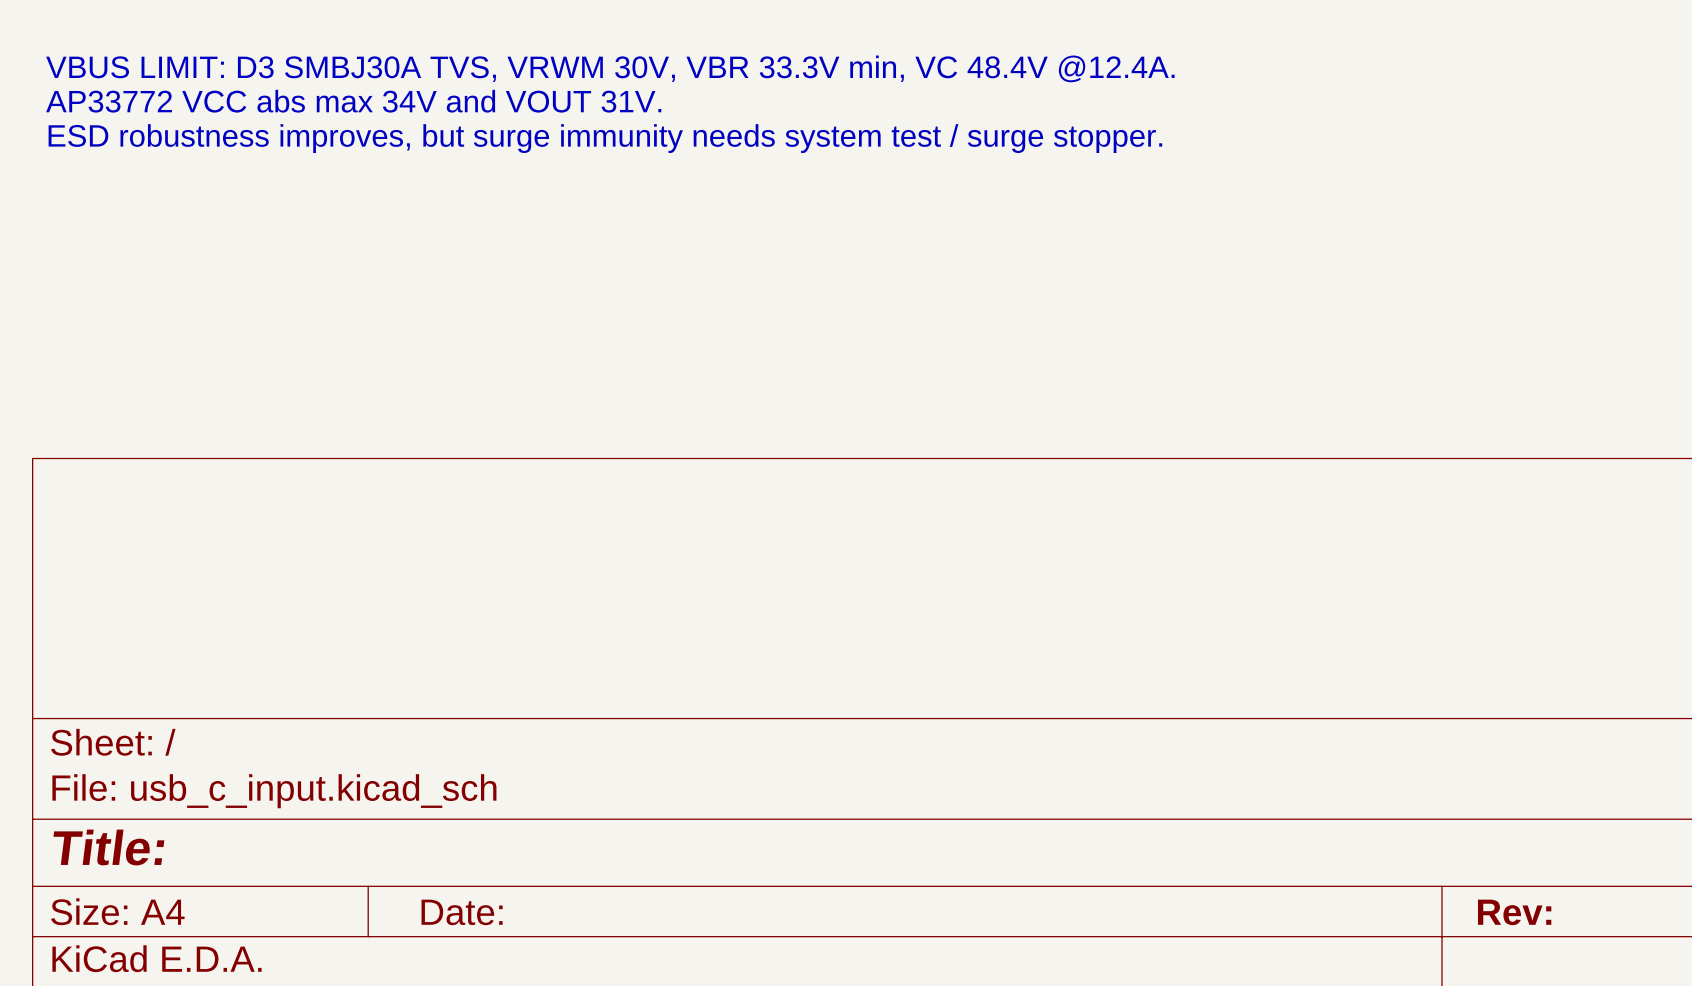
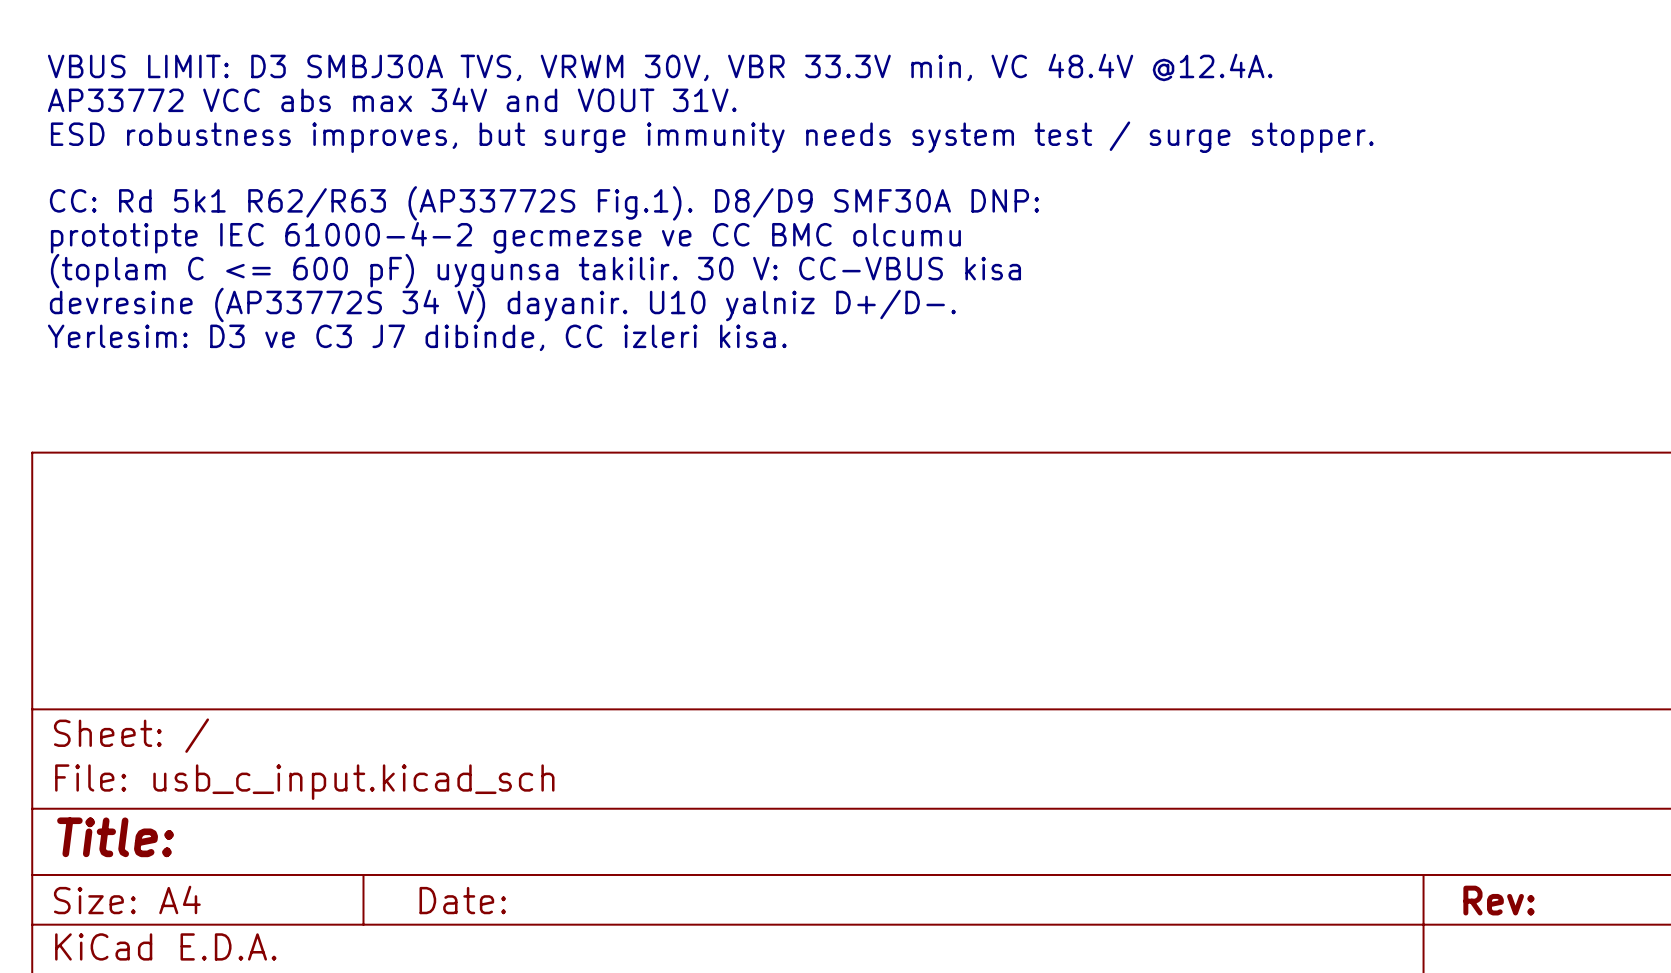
text: none -> CC: Rd 5k1 R62/R63 (AP33772S Fig.1). D8/D9 SMF30A DNP: (544, 203)
text: none -> prototipte IEC 61000-4-2 gecmezse ve CC BMC olcumu (505, 237)
text: none -> (toplam C <= 600 pF) uygunsa takilir. 30 V: CC-VBUS kisa (535, 271)
text: none -> devresine (AP33772S 34 V) dayanir. U10 yalniz D+/D-. (502, 304)
text: none -> Yerlesim: D3 ve C3 J7 dibinde, CC izleri kisa. (417, 337)

